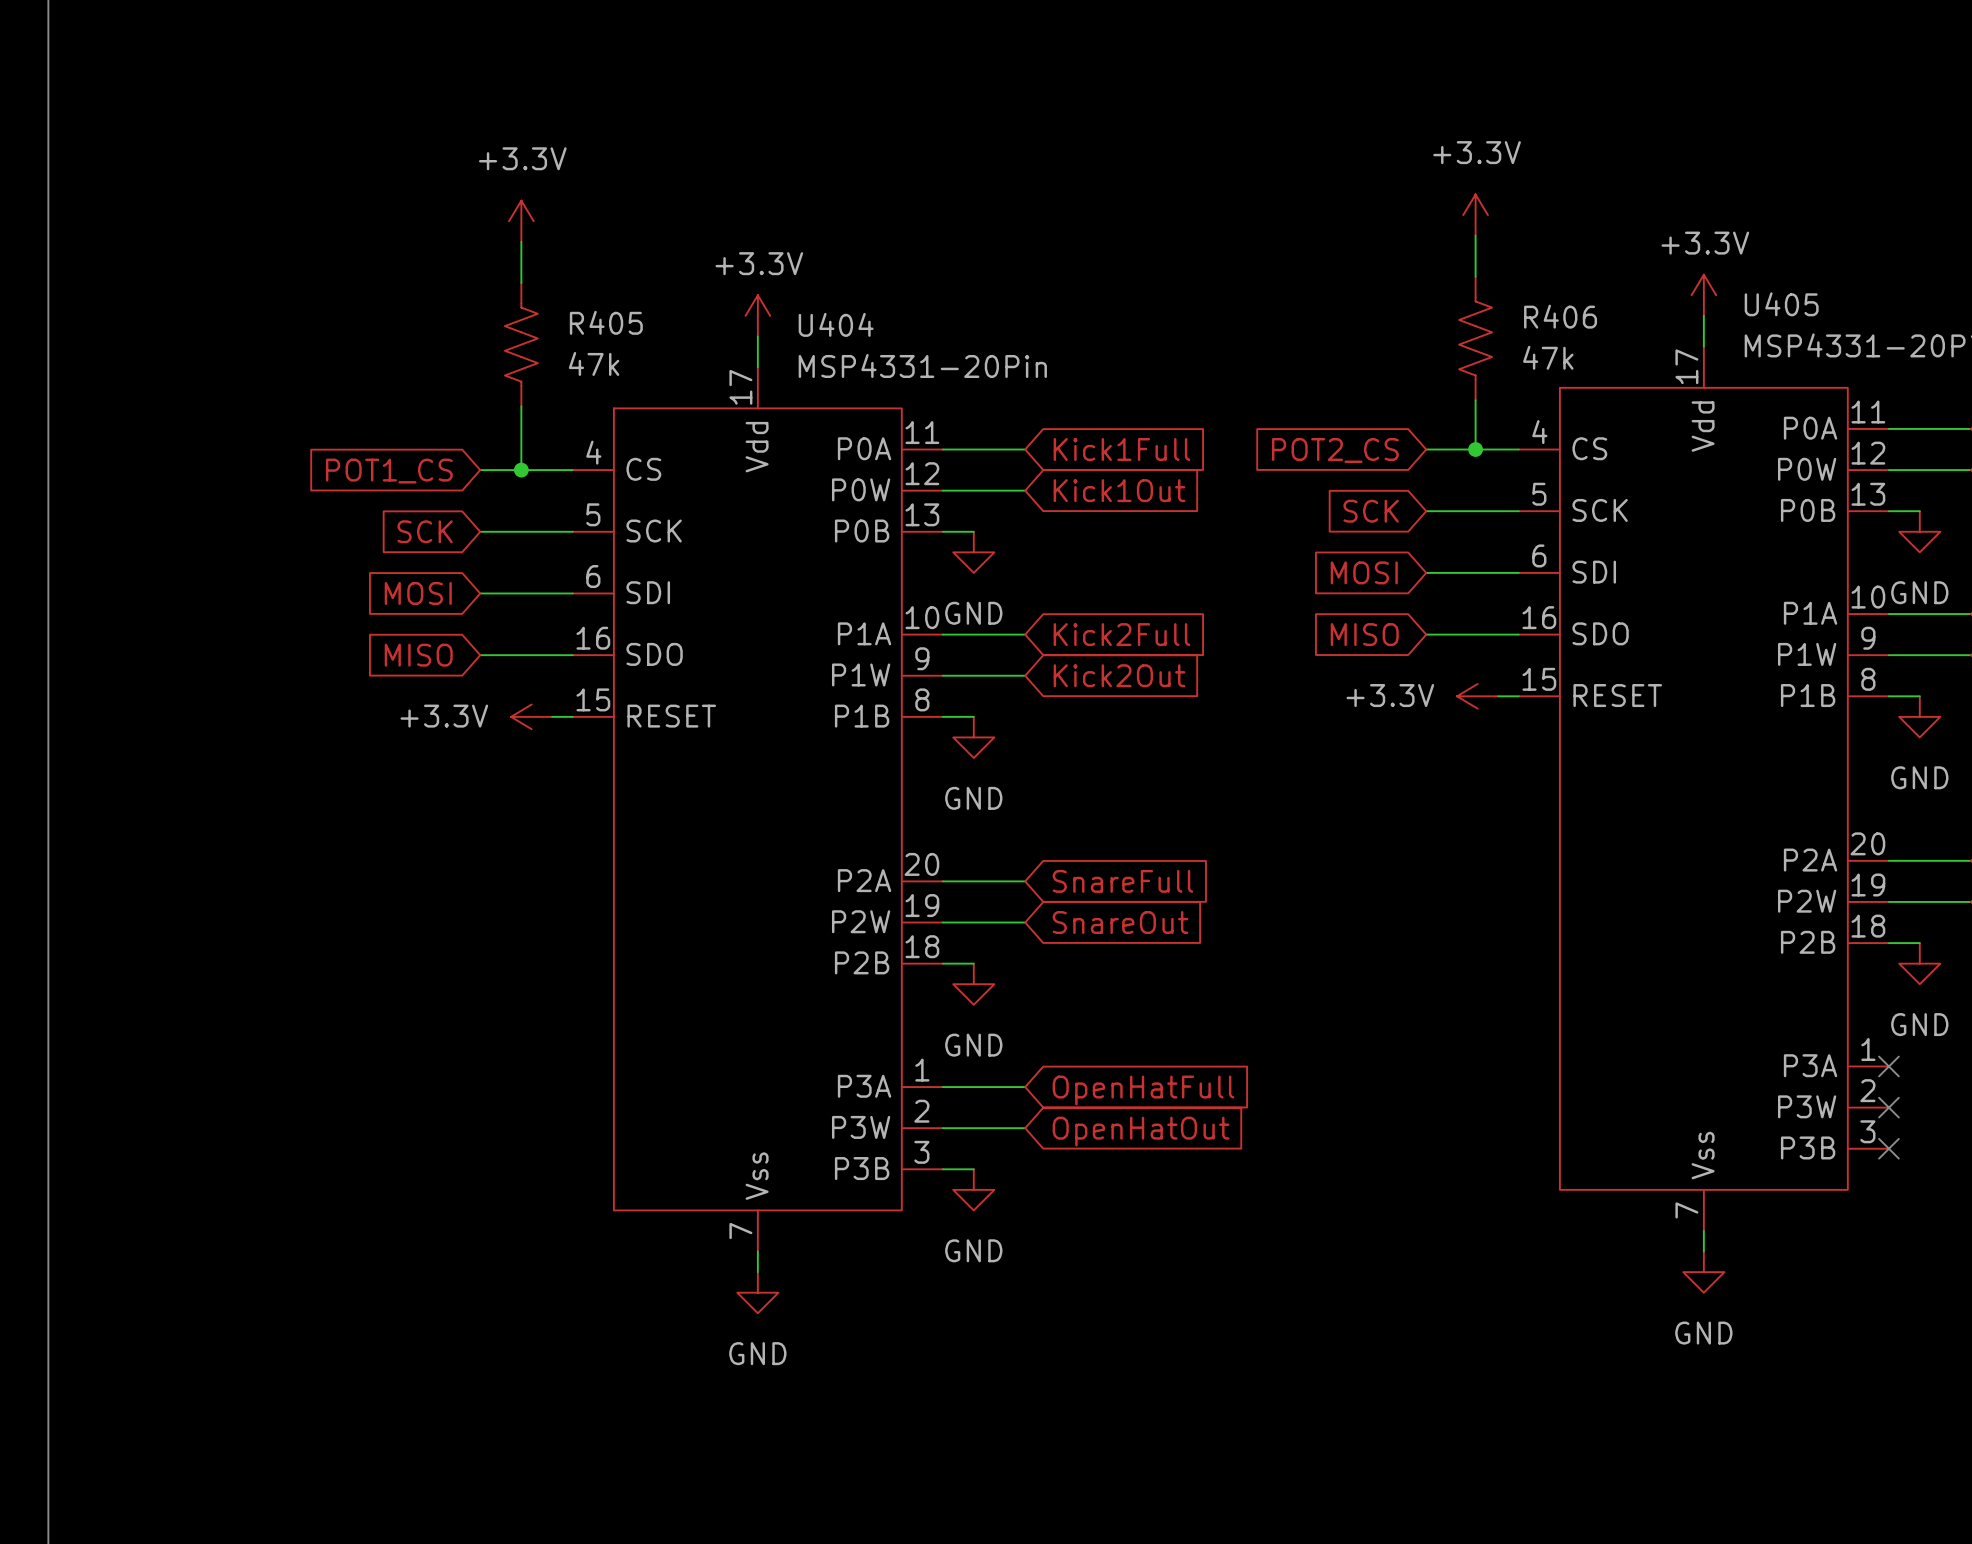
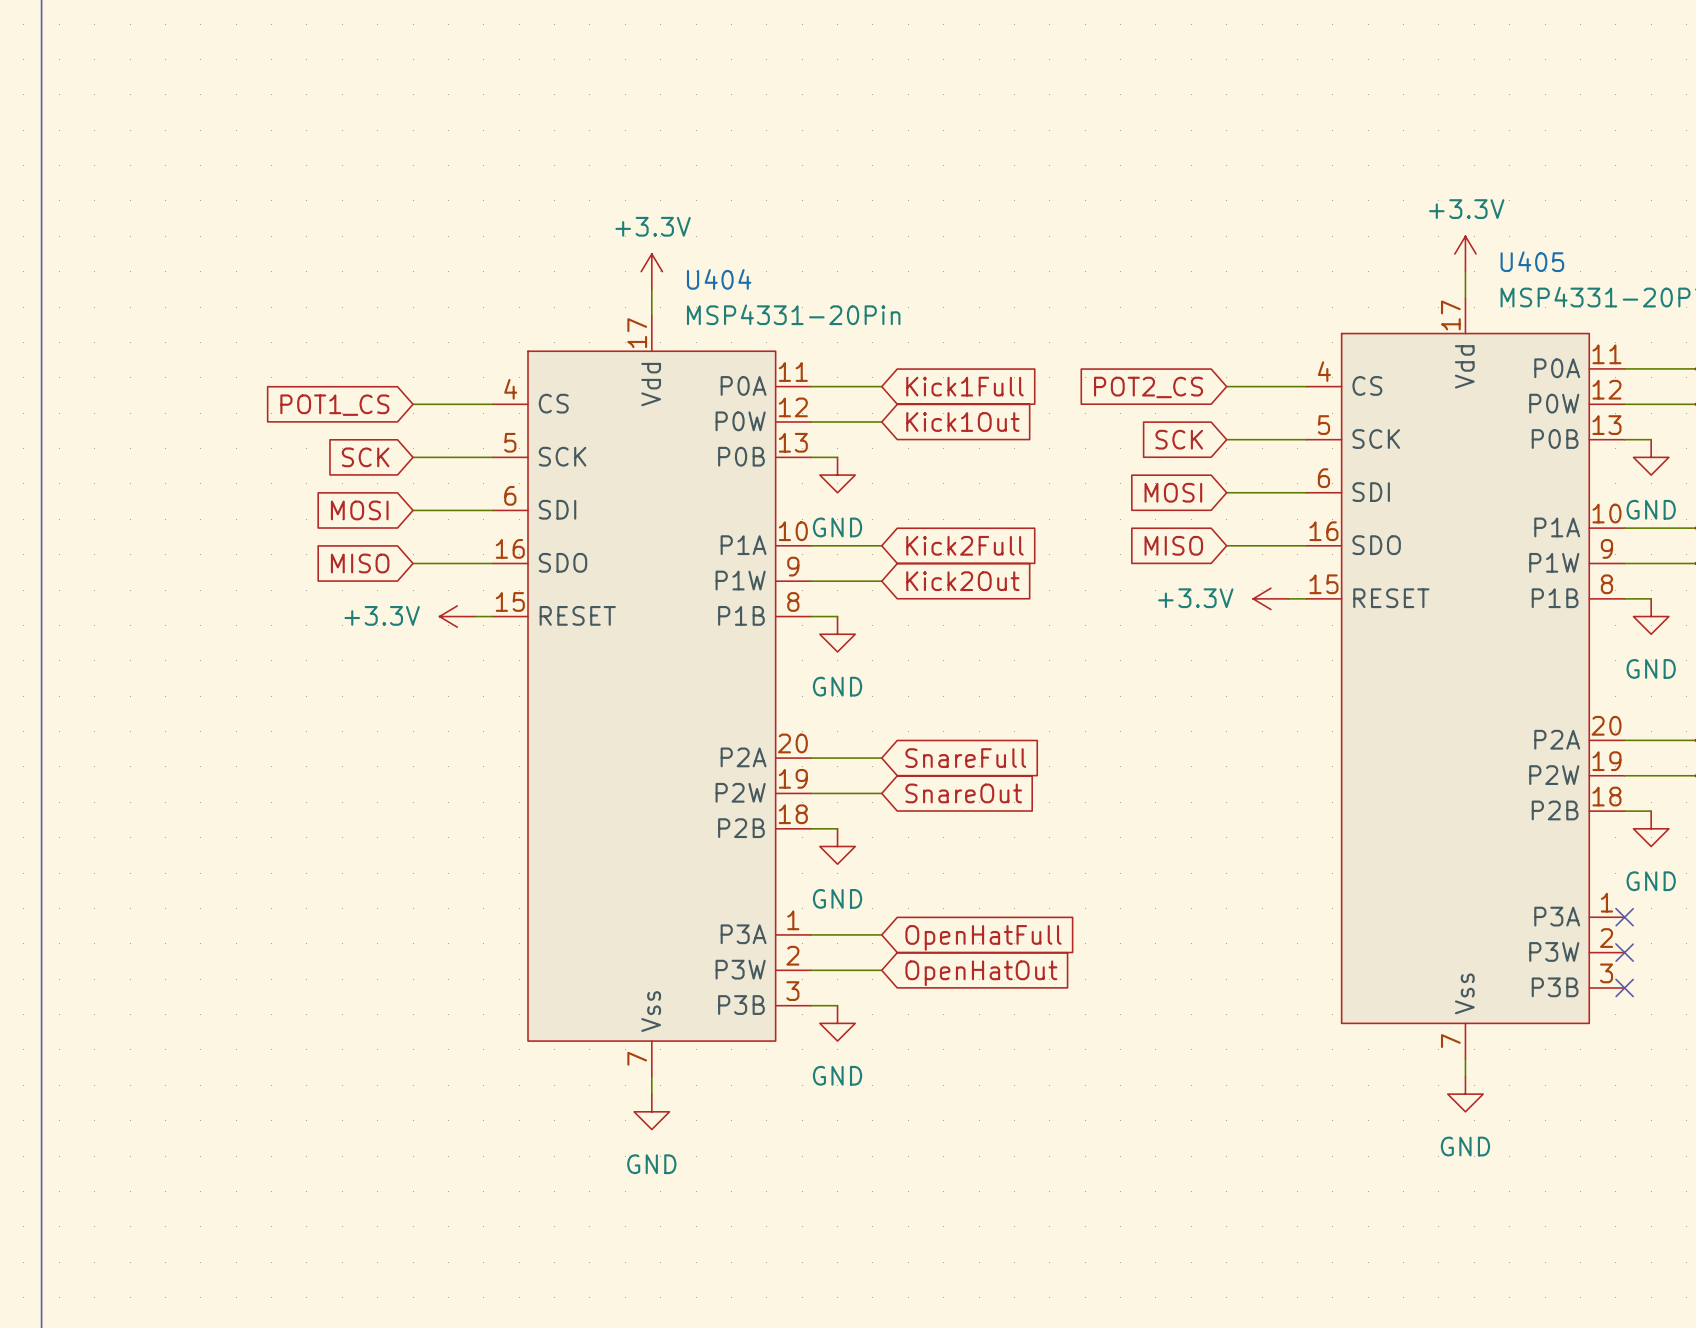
power symbol: +3.3V (1475, 215) -> none
power symbol: +3.3V (521, 221) -> none
wire: (1475, 235) (1475, 276) -> none
wire: (521, 241) (521, 282) -> none
R406: 47k (1475, 338) -> none
R405: 47k (521, 344) -> none
wire: (1475, 400) (1475, 449) -> none
wire: (521, 406) (521, 470) -> none
junction: (1475, 449) -> none
junction: (521, 470) -> none

